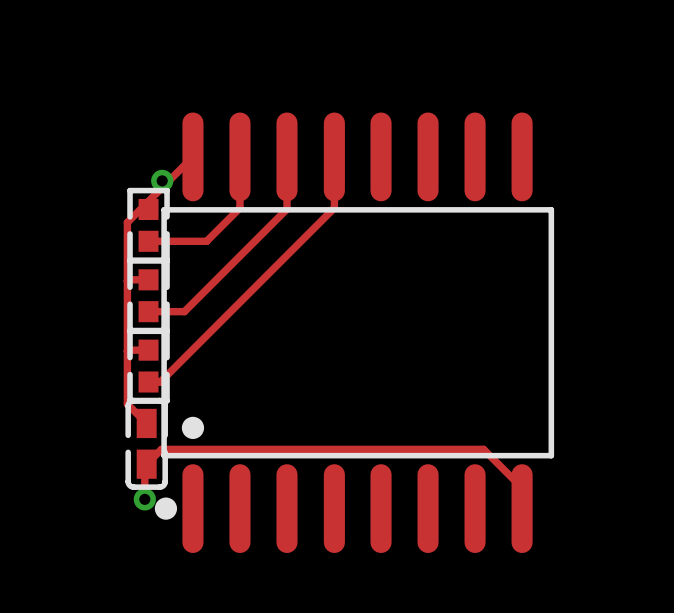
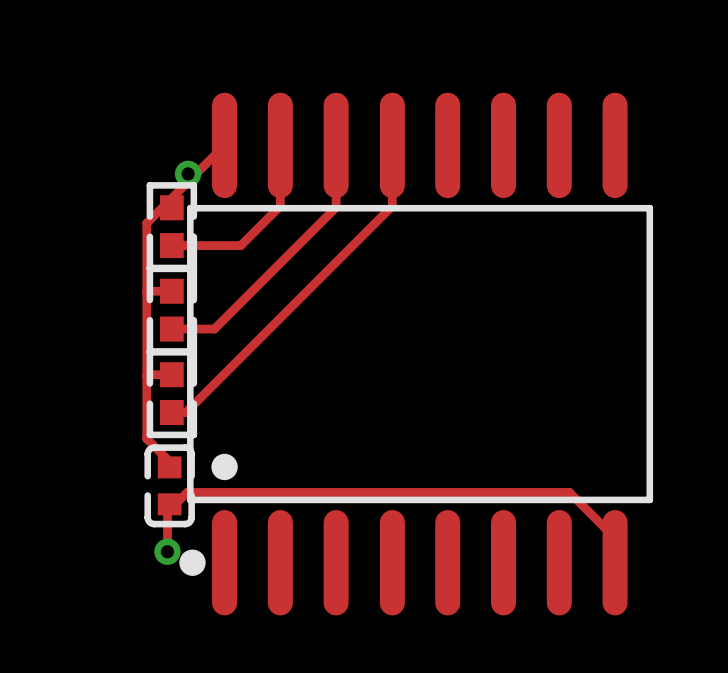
part footprint: [125, 397, 168, 490] -> [144, 444, 195, 528]

